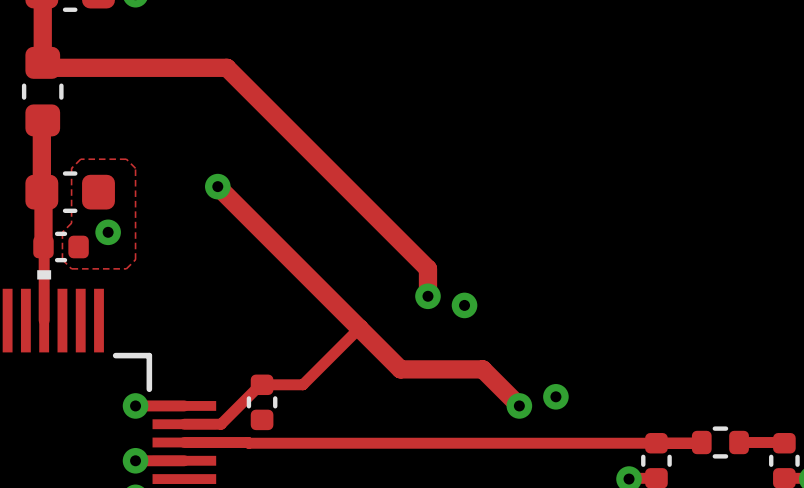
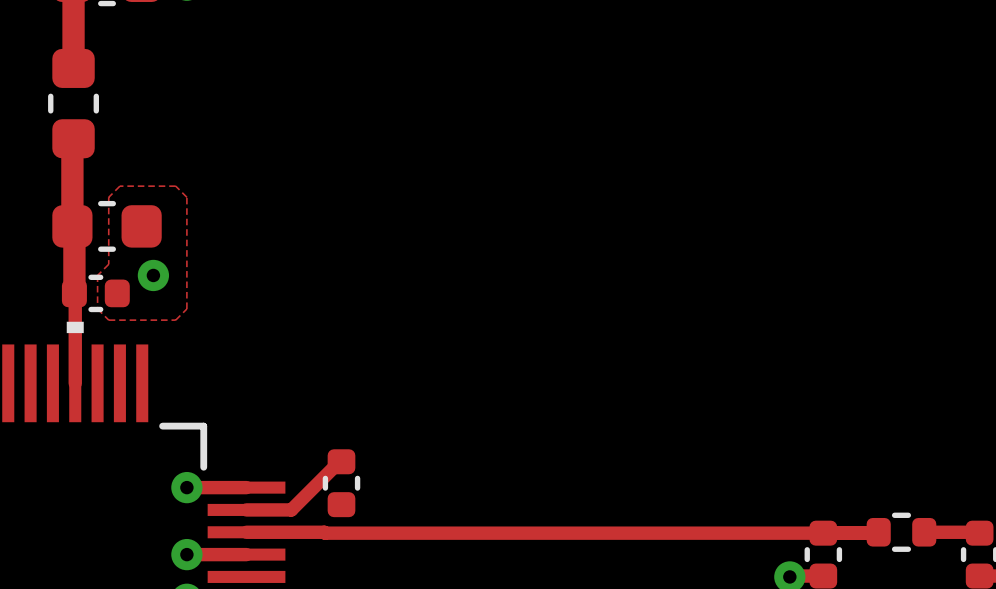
track: (42, 62) (47, 67) (226, 67) (427, 268) (427, 296) -> none
track: (217, 186) (400, 369) (482, 369) (519, 405) -> none
via: (217, 186) -> none
via: (427, 296) -> none
via: (464, 305) -> none
track: (359, 328) (302, 384) (262, 384) -> none
via: (555, 396) -> none
via: (519, 405) -> none

